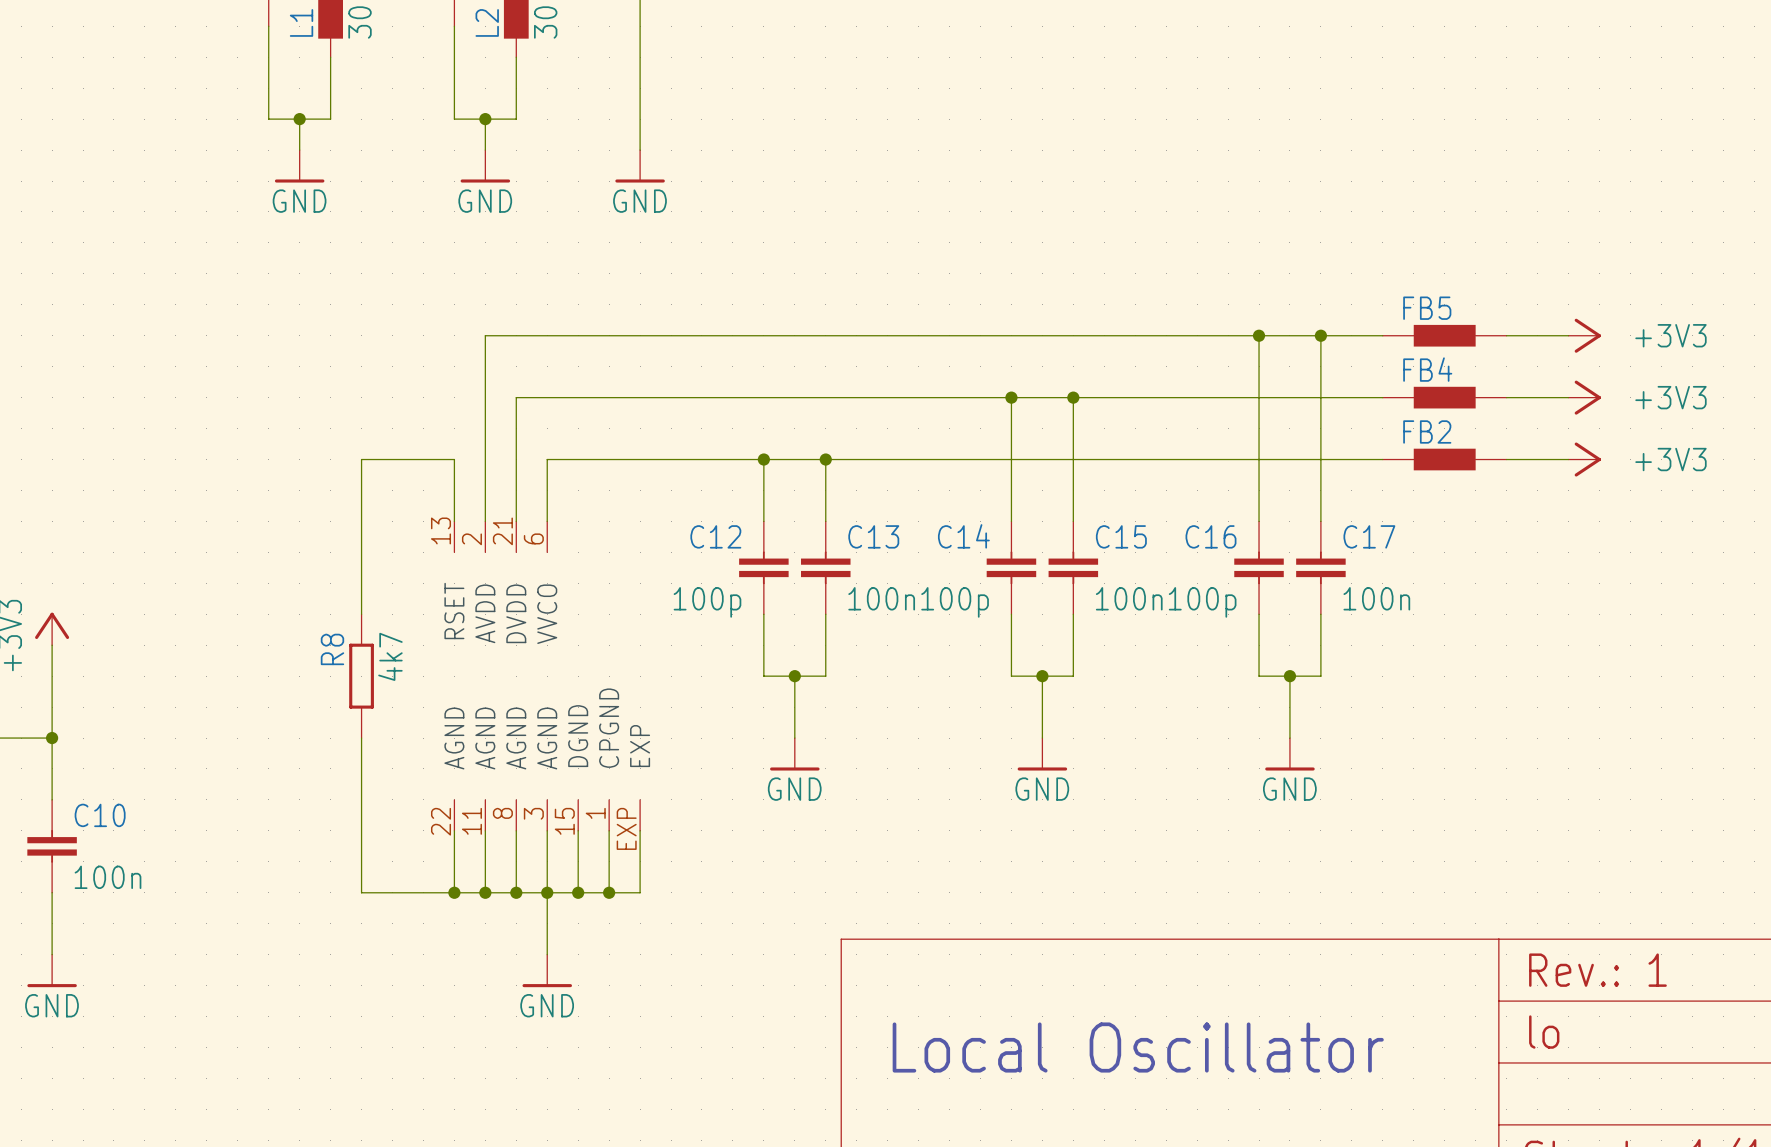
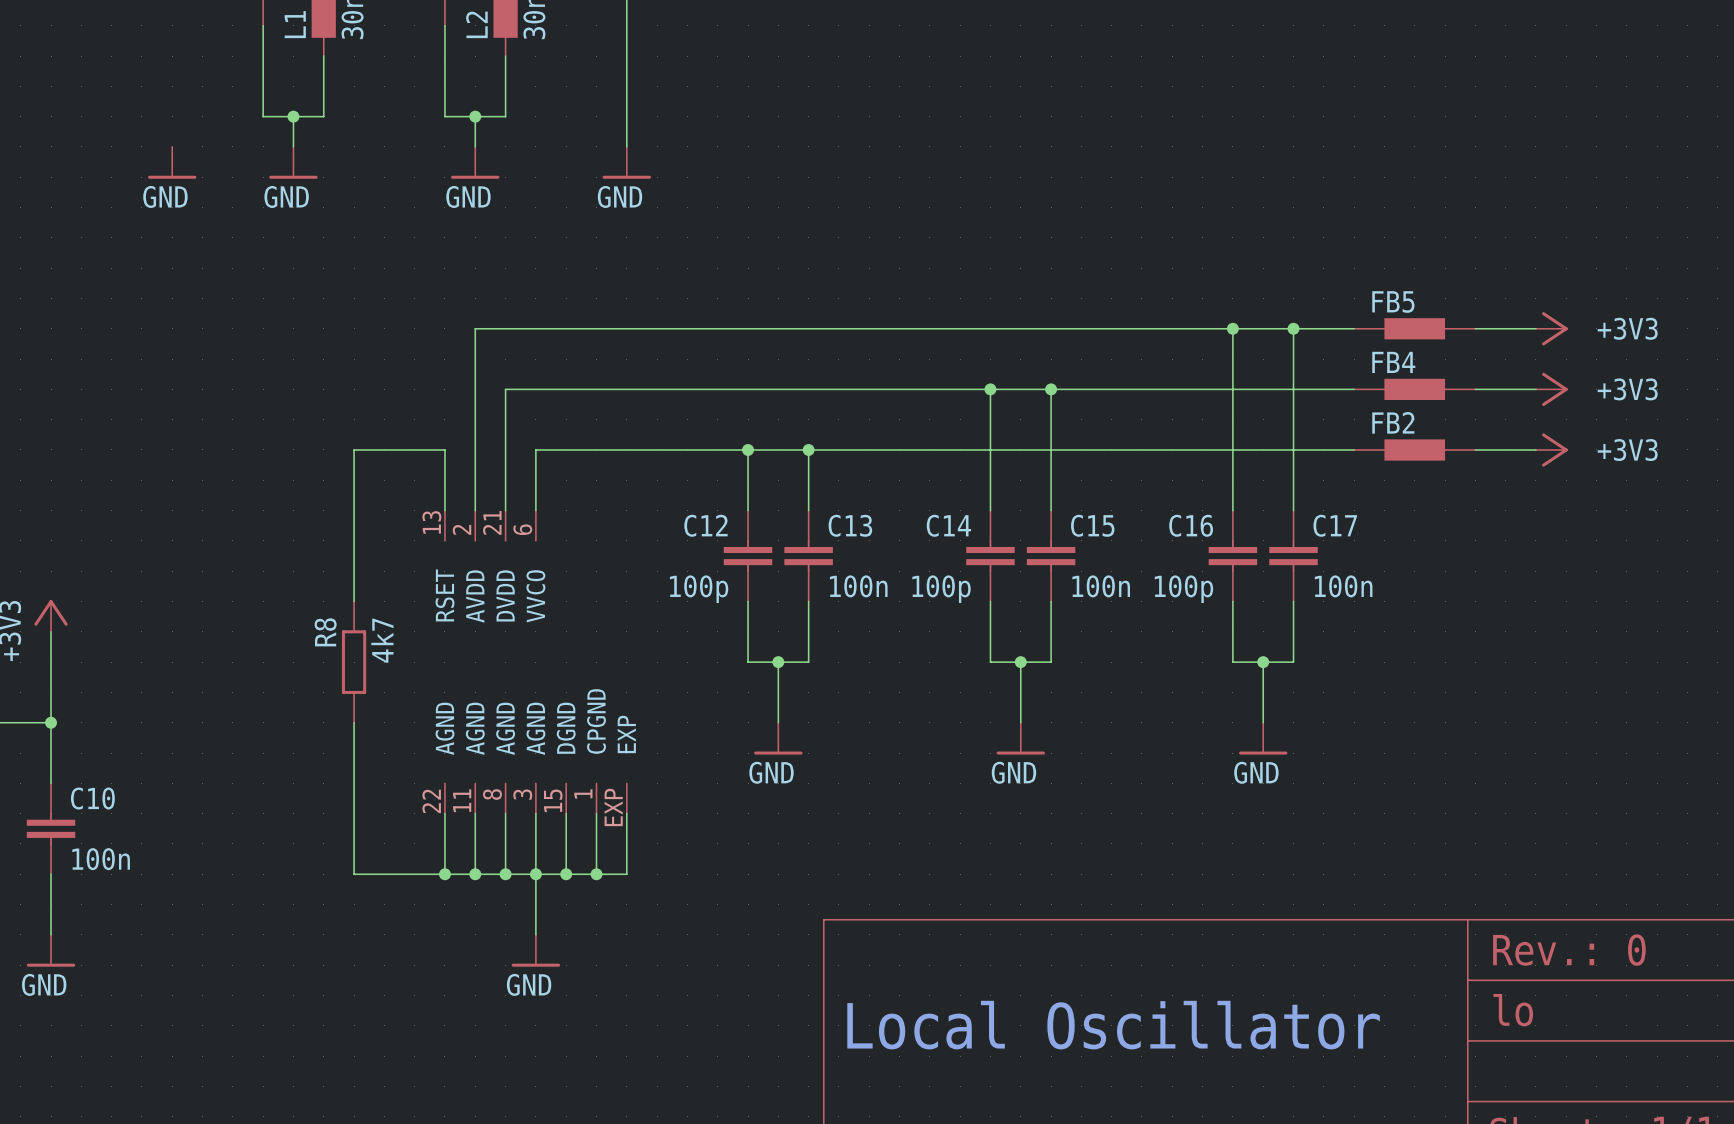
power symbol: none -> GND (172, 162)
text: Rev.: 1 (1597, 970) -> Rev.: 0 (1569, 950)

